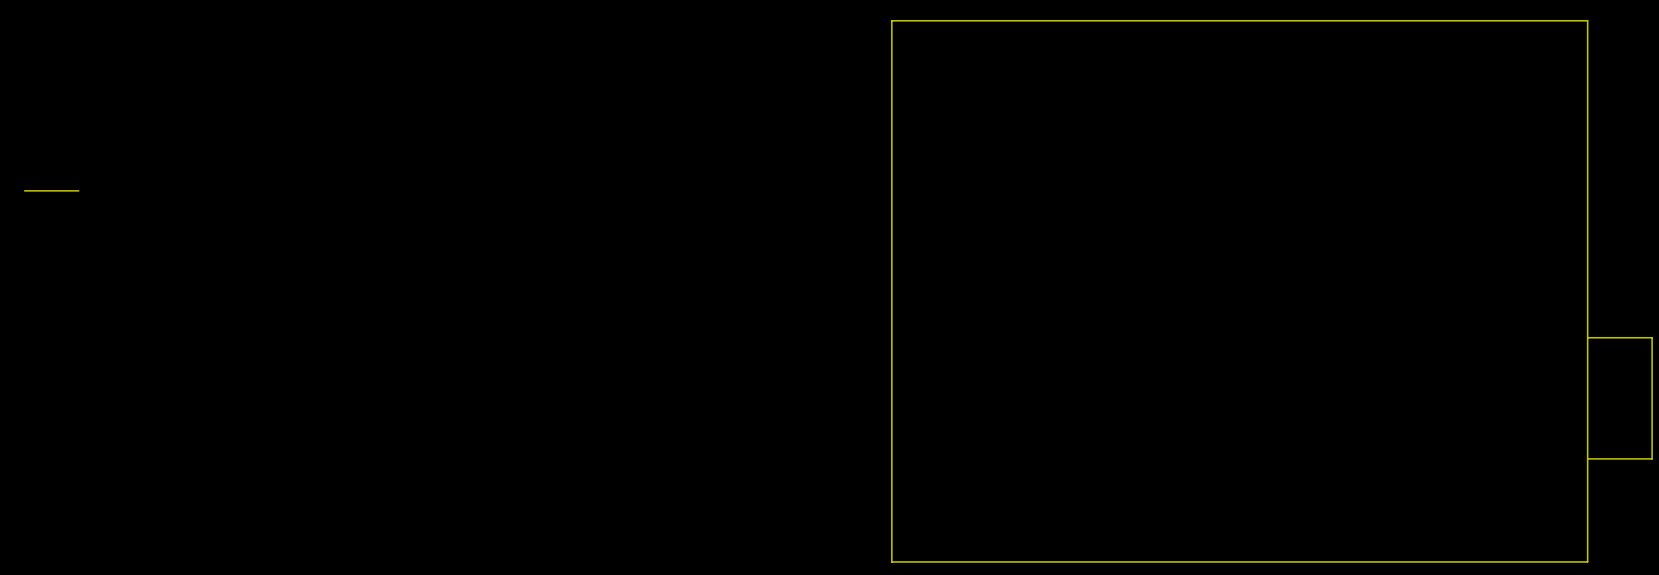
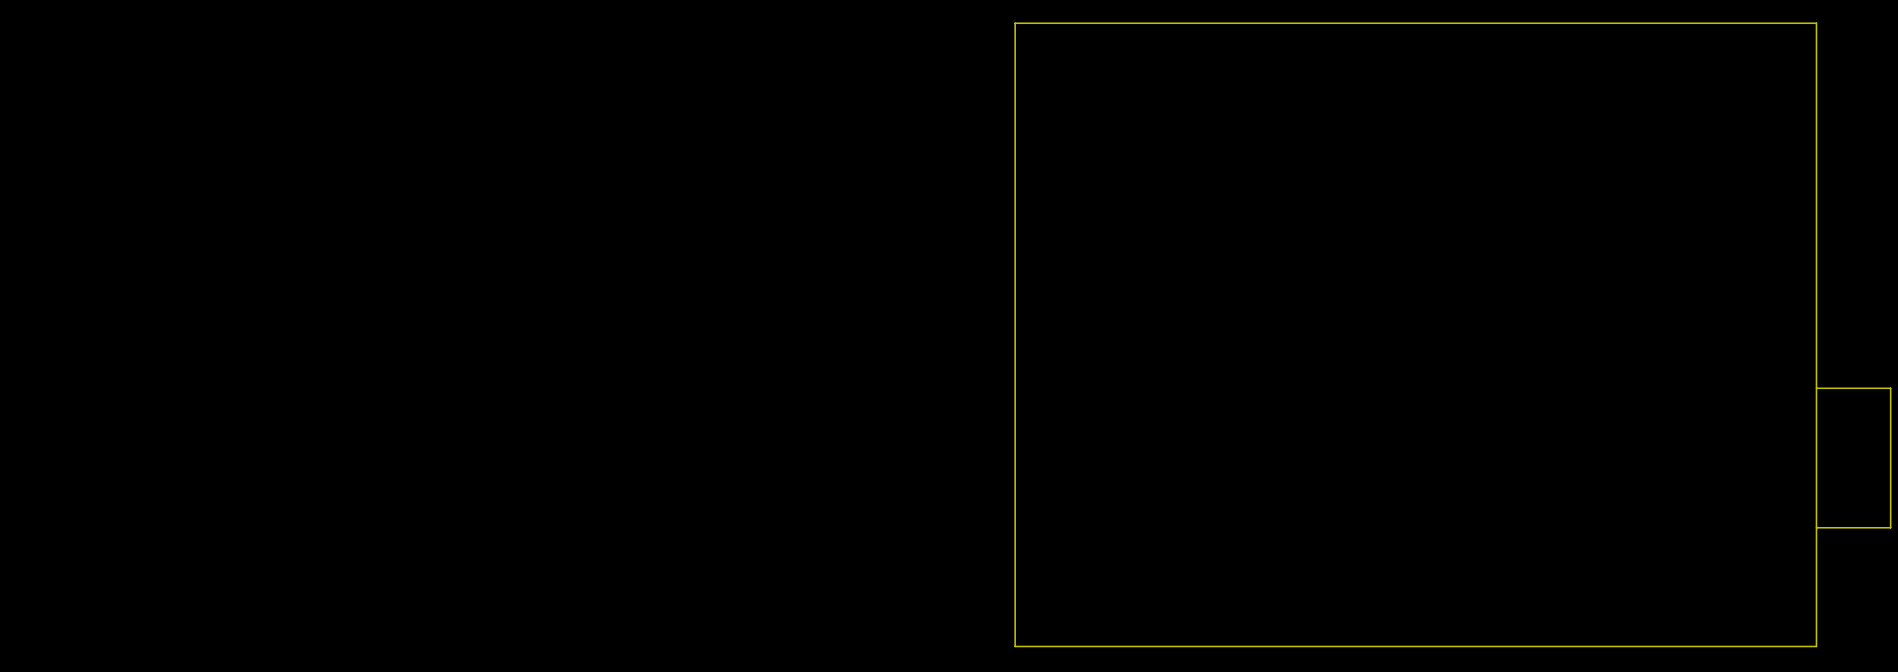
board edge: (24, 190) (78, 190) -> none

